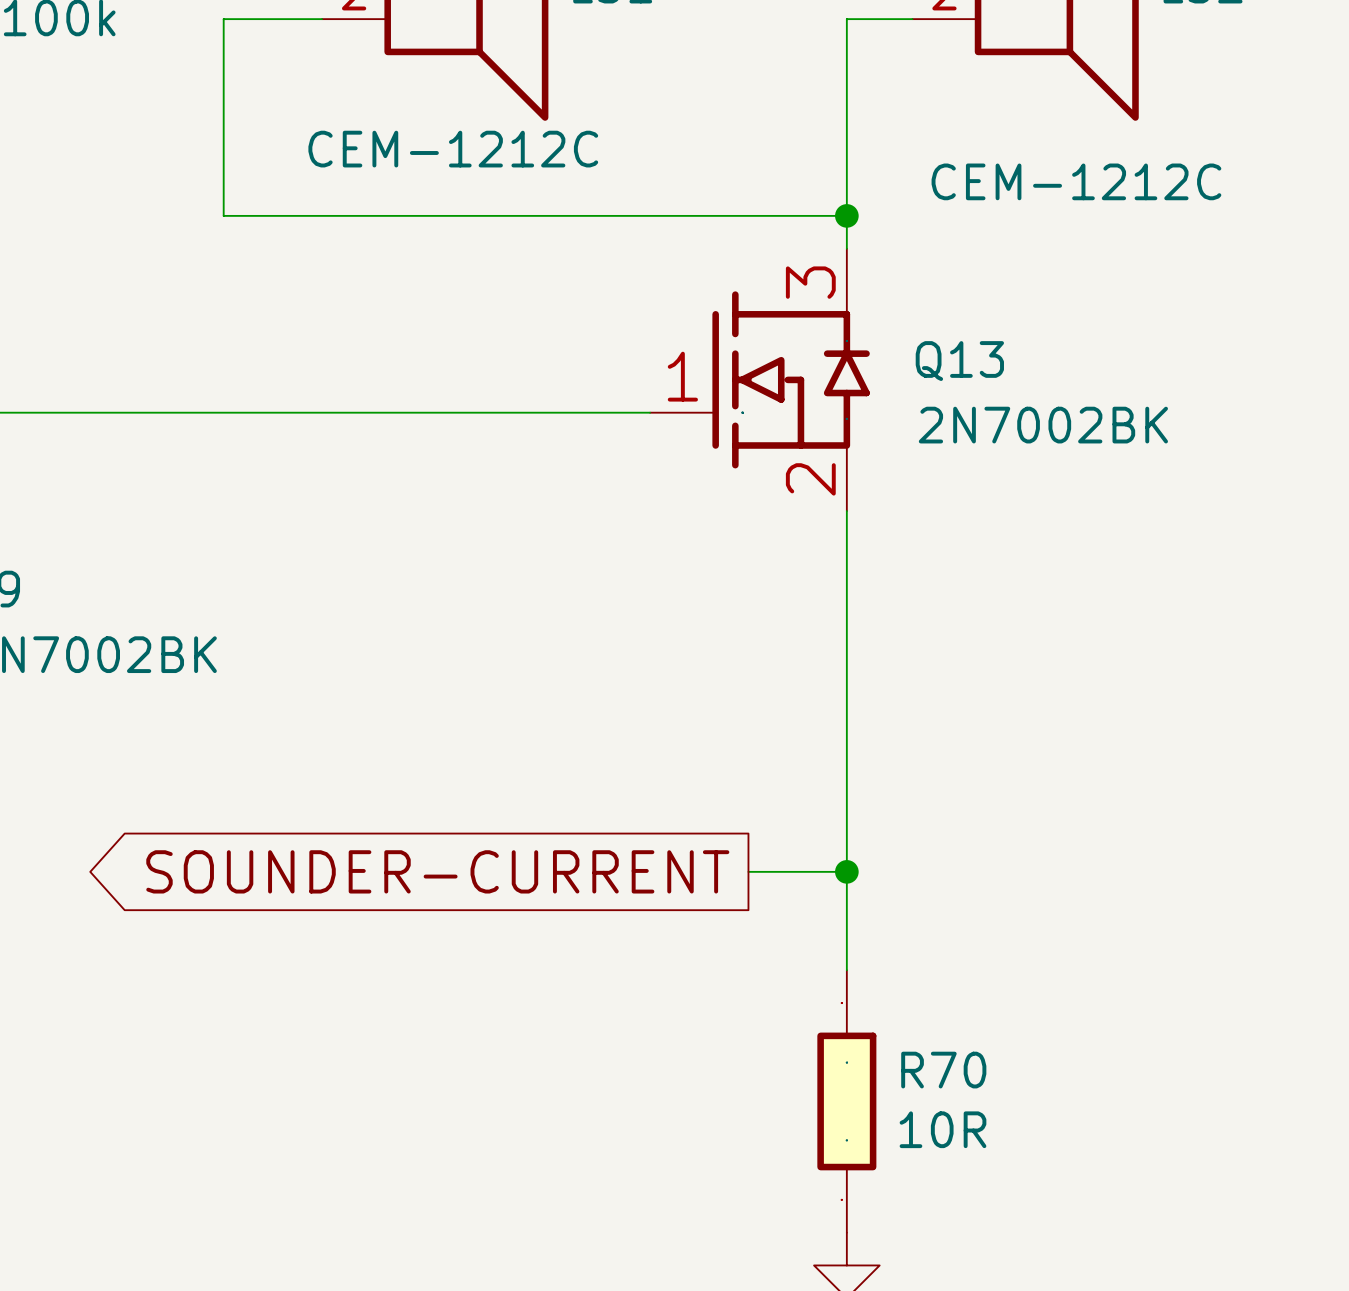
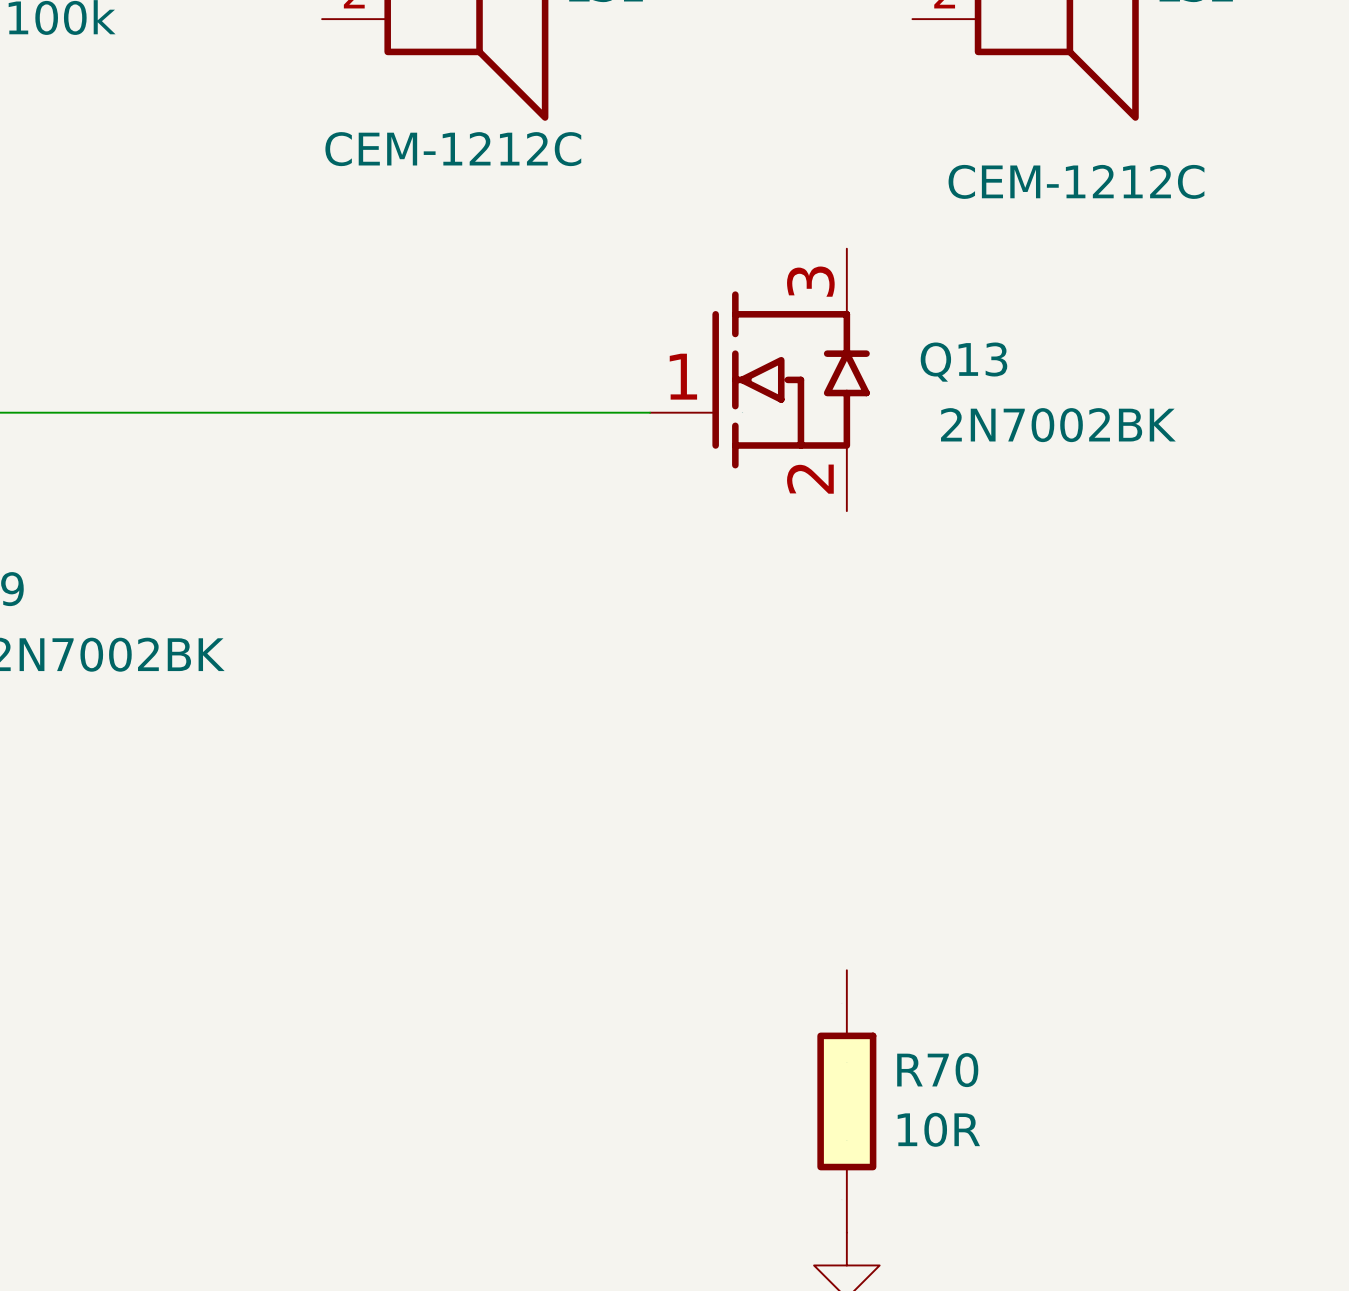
wire: (322, 19) (223, 19) (223, 215) (846, 215) -> none
wire: (912, 19) (846, 19) (846, 248) -> none
junction: (846, 215) -> none
wire: (846, 511) (846, 970) -> none
global label: SOUNDER-CURRENT (437, 871) -> none
wire: (748, 871) (846, 871) -> none
junction: (846, 871) -> none

